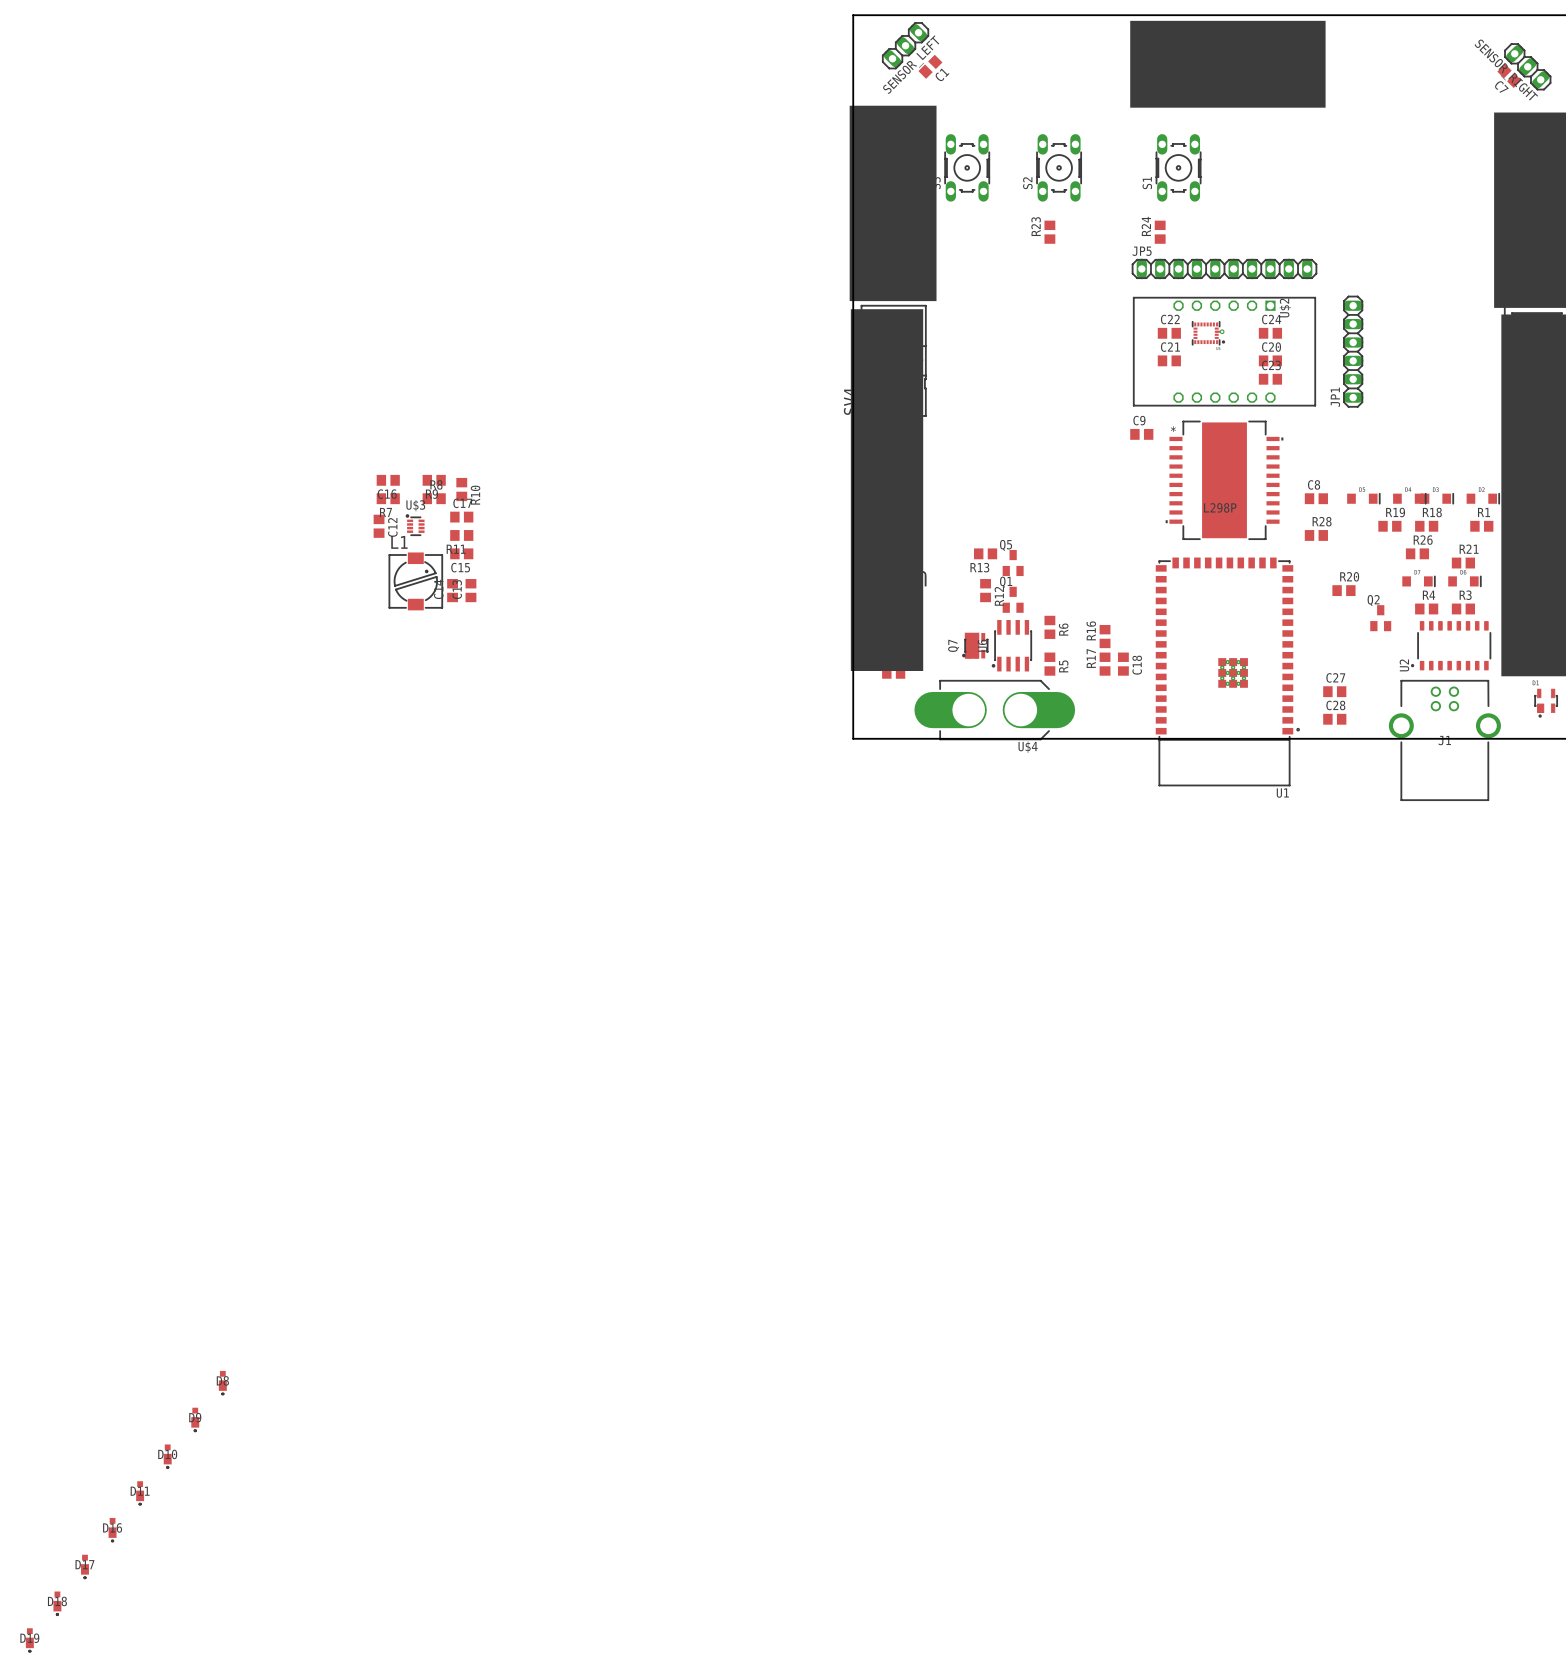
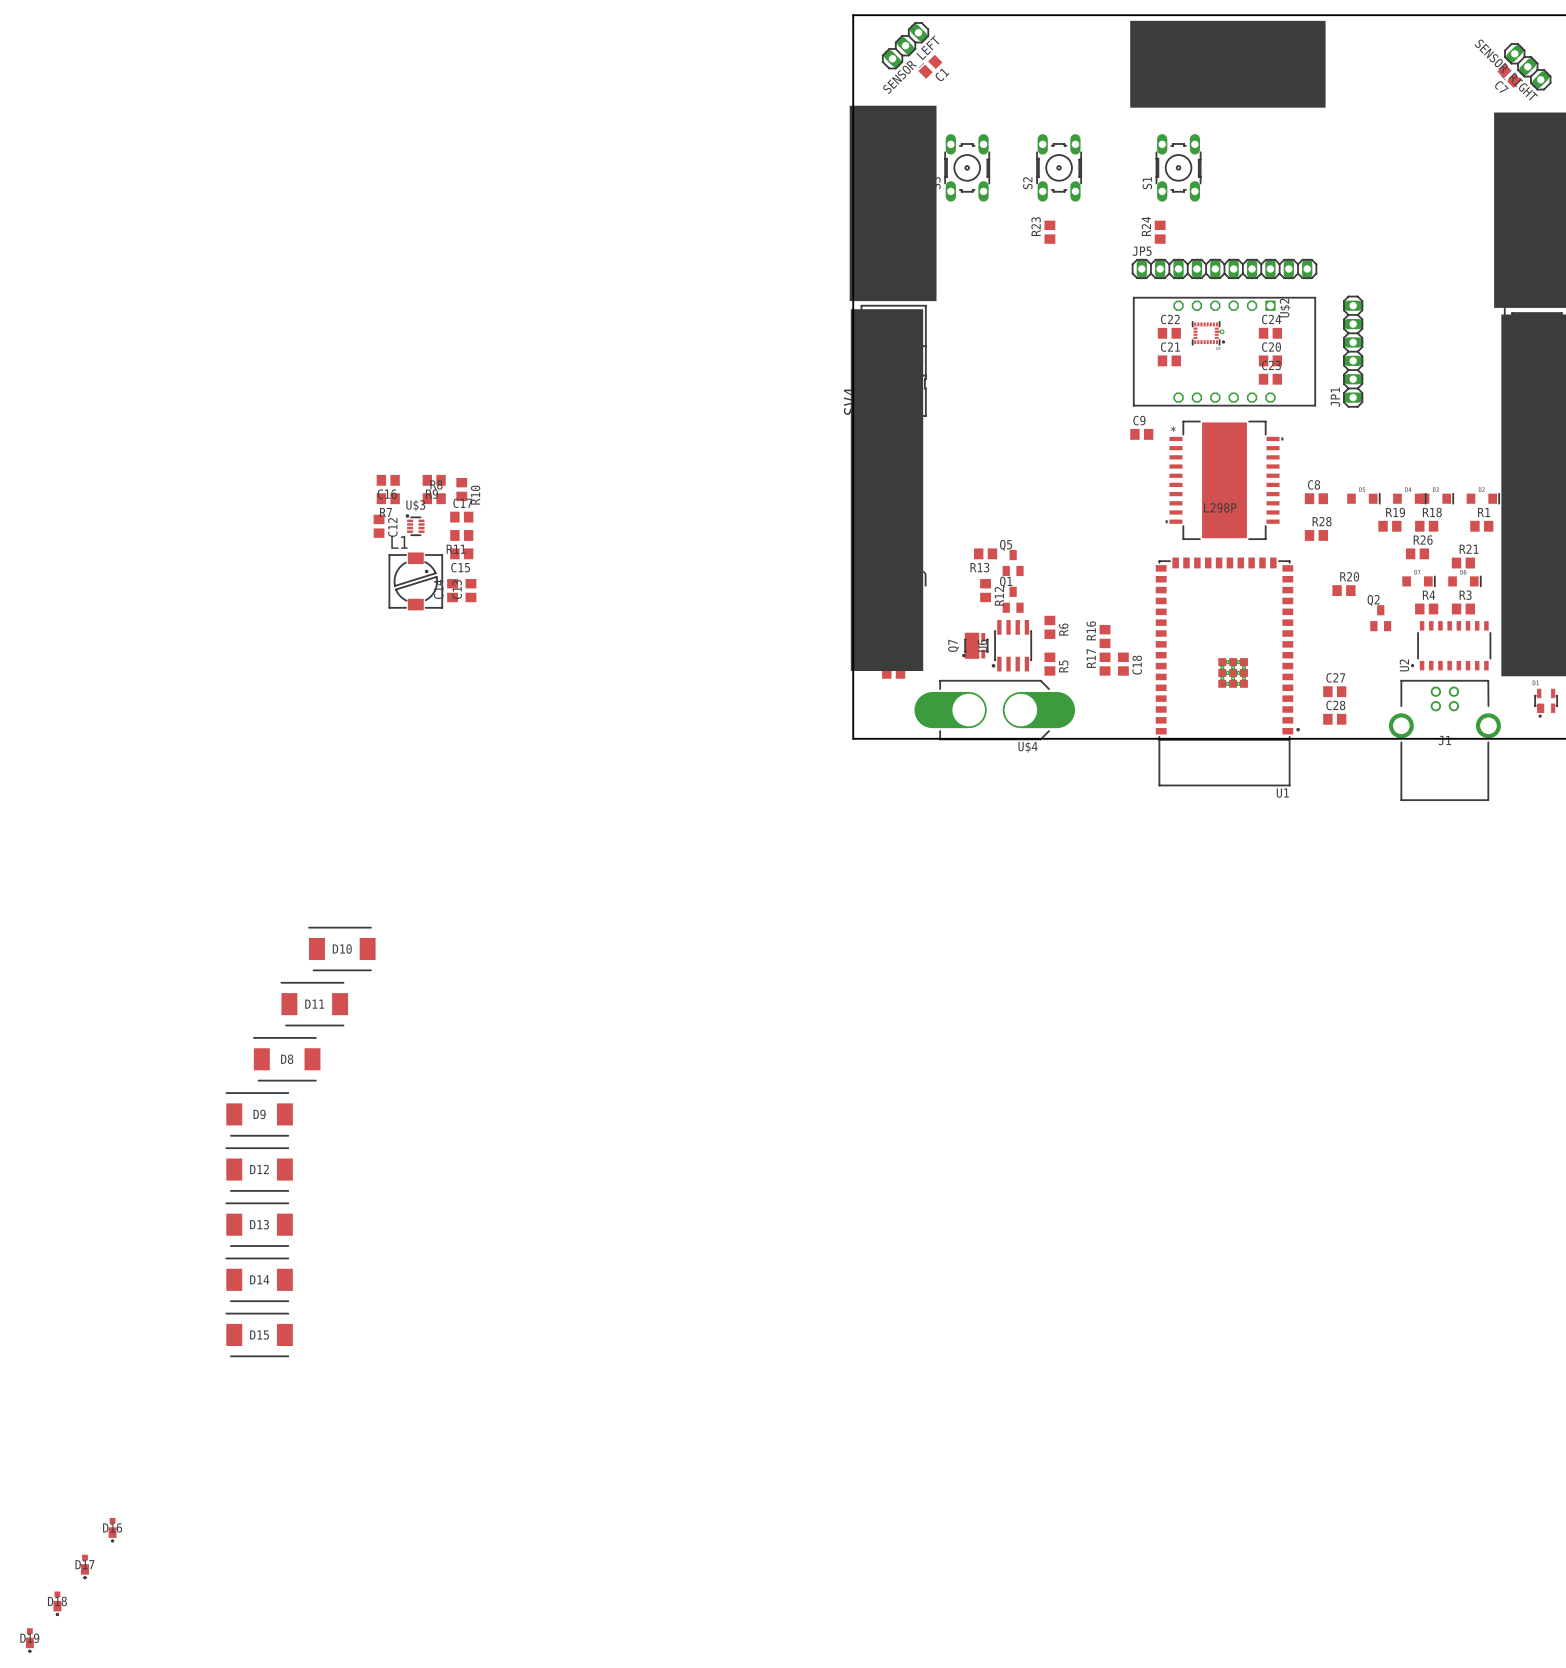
D12: none -> (259, 1169)
D13: none -> (259, 1224)
D14: none -> (259, 1279)
D15: none -> (259, 1334)
D8 footprint: [218, 1370, 227, 1396] -> [253, 1037, 321, 1082]
D9 footprint: [191, 1407, 200, 1433] -> [225, 1092, 293, 1137]
D10 footprint: [163, 1444, 172, 1469] -> [308, 926, 376, 972]
D11 footprint: [136, 1481, 145, 1506] -> [280, 982, 349, 1027]

